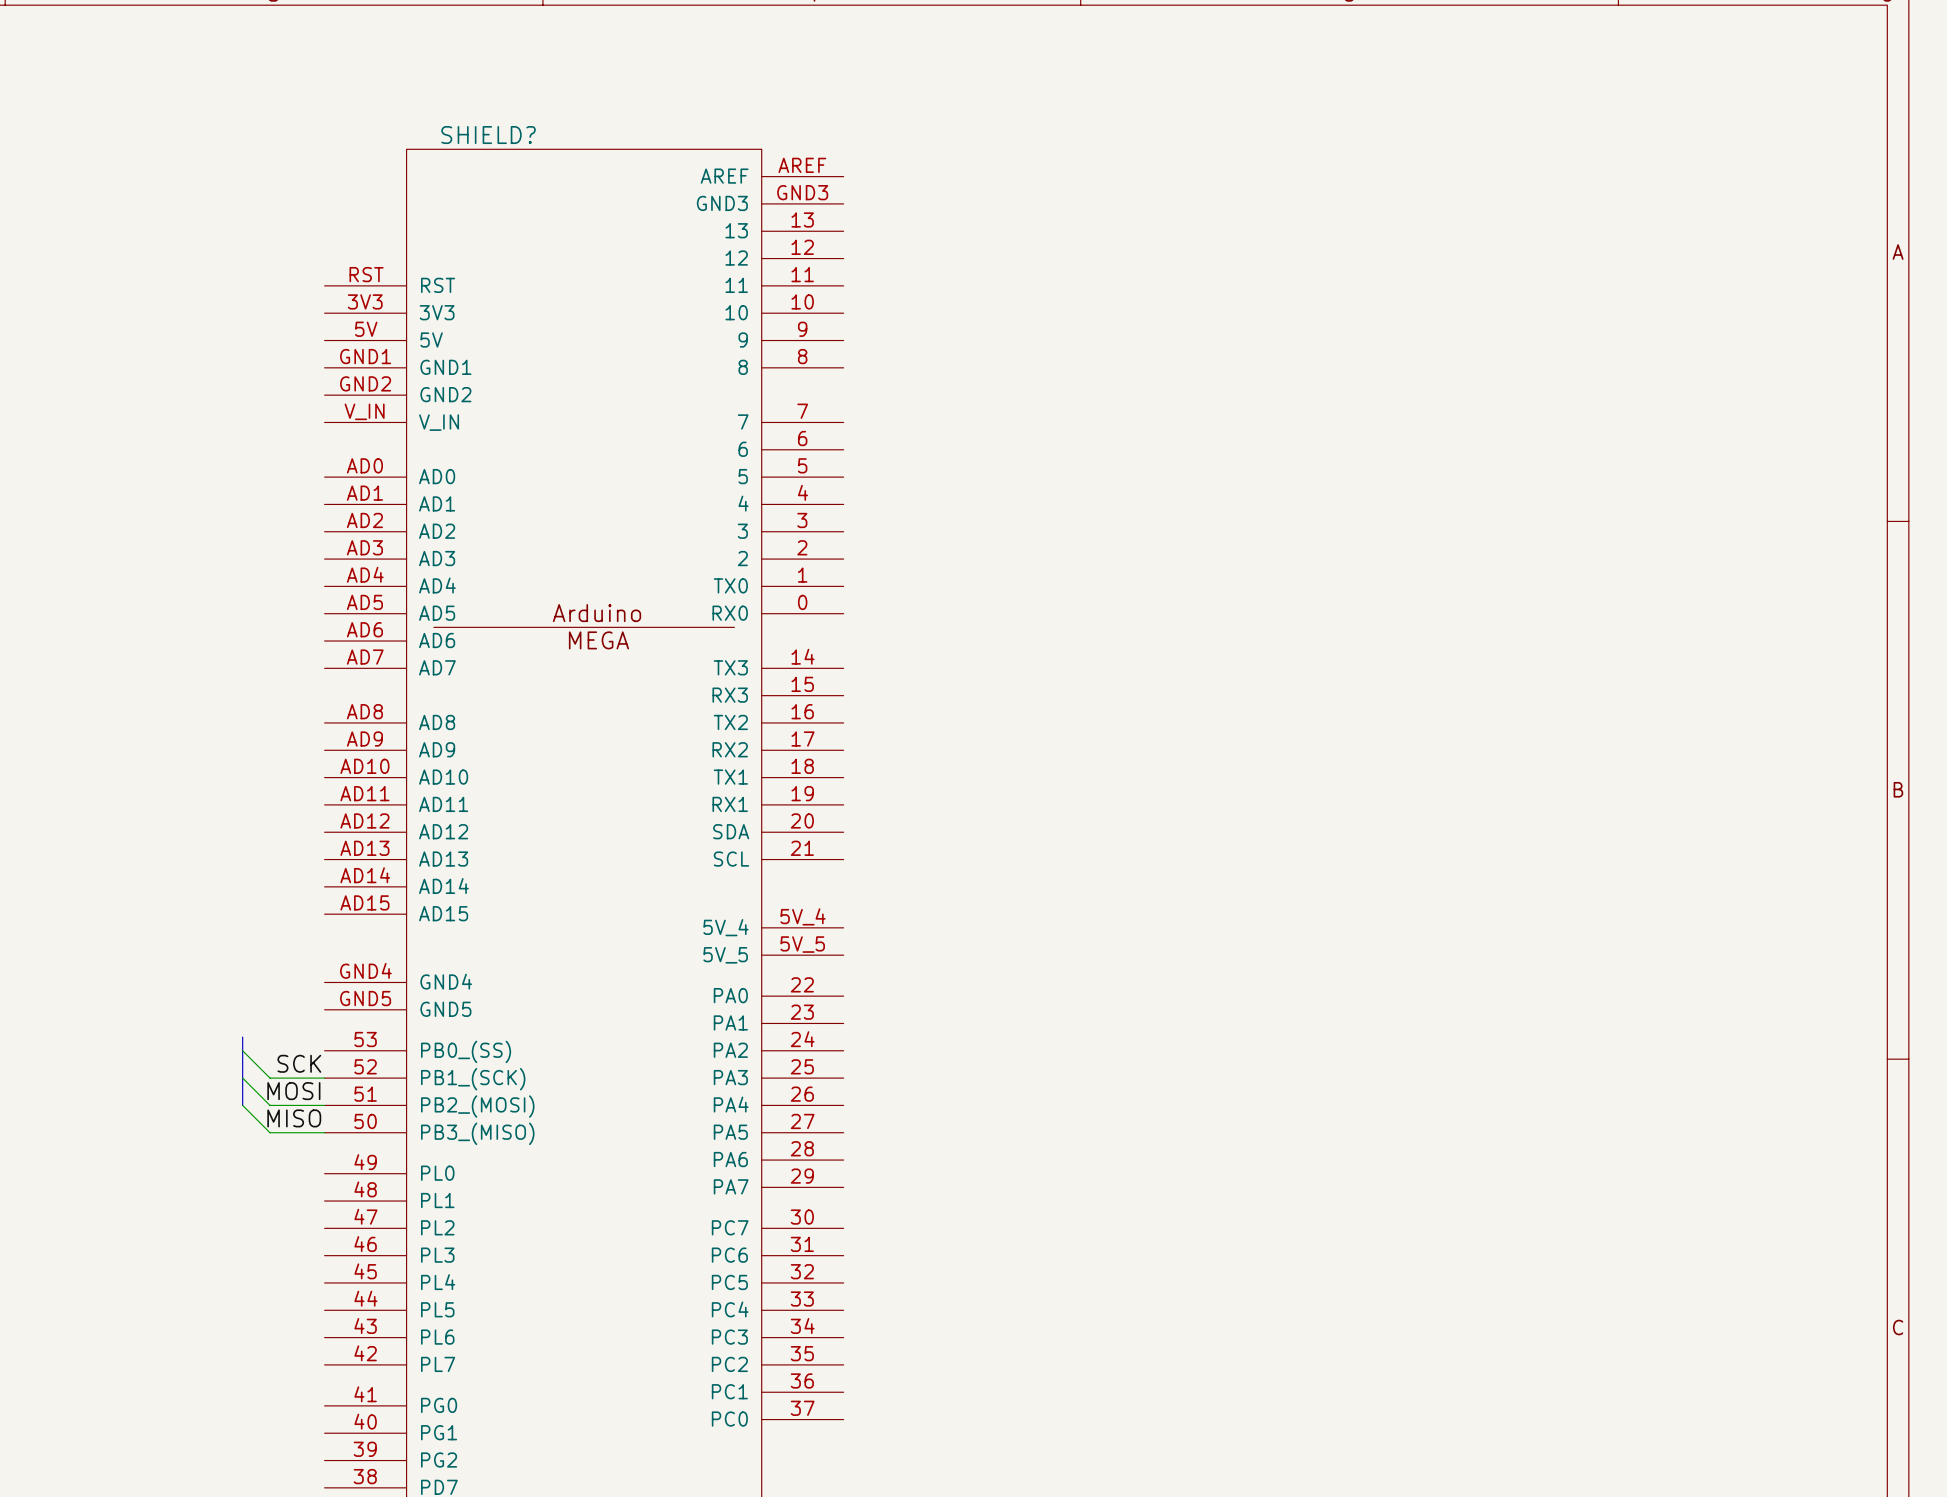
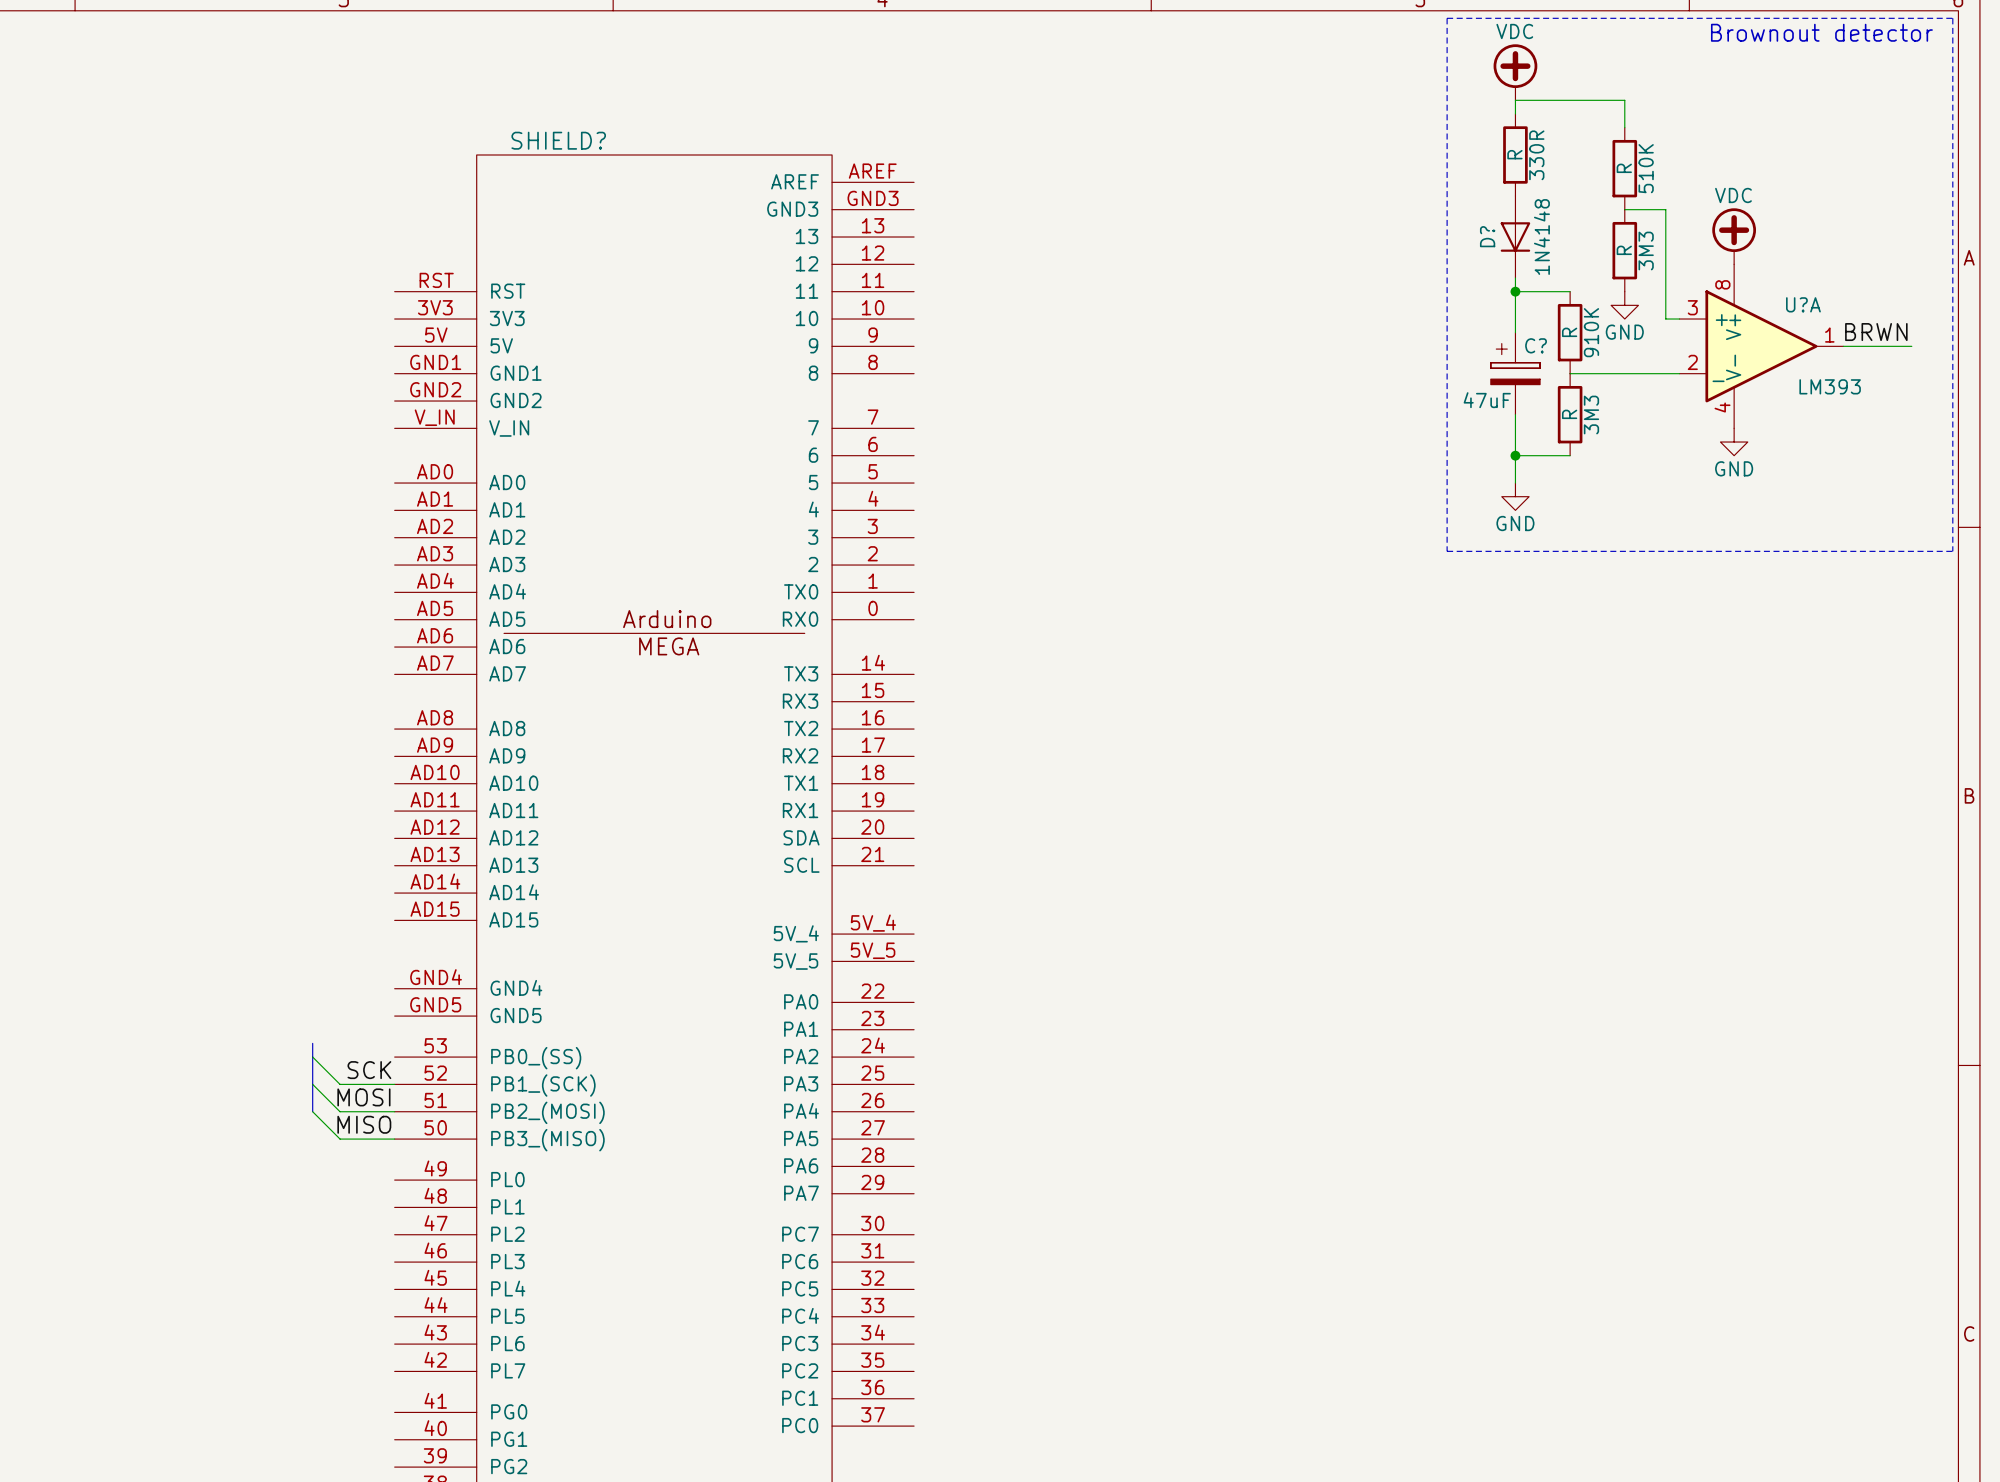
line: none -> (1447, 18) (1952, 18) (1952, 551) (1447, 551) (1447, 18)
text: none -> Brownout detector (1821, 32)
power symbol: none -> VDC (1515, 72)
wire: none -> (1515, 113) (1515, 100) (1624, 100) (1624, 127)
330R: none -> R (1515, 154)
510K: none -> R (1624, 168)
wire: none -> (1624, 209) (1665, 209) (1665, 319) (1679, 319)
power symbol: none -> VDC (1734, 236)
D?: none -> 1N4148 (1515, 237)
3M3: none -> R (1624, 250)
wire: none -> (1515, 278) (1515, 332)
wire: none -> (1515, 291) (1570, 291)
junction: none -> (1515, 291)
power symbol: none -> GND (1624, 305)
910K: none -> R (1570, 332)
label: none -> BRWN (1876, 332)
U?A: none -> LM393 (1761, 346)
wire: none -> (1843, 346) (1911, 346)
C?: none -> 47uF (1515, 373)
wire: none -> (1570, 373) (1679, 373)
wire: none -> (1515, 414) (1515, 483)
3M3: none -> R (1570, 414)
power symbol: none -> GND (1734, 442)
wire: none -> (1515, 455) (1570, 455)
junction: none -> (1515, 455)
power symbol: none -> GND (1515, 496)

